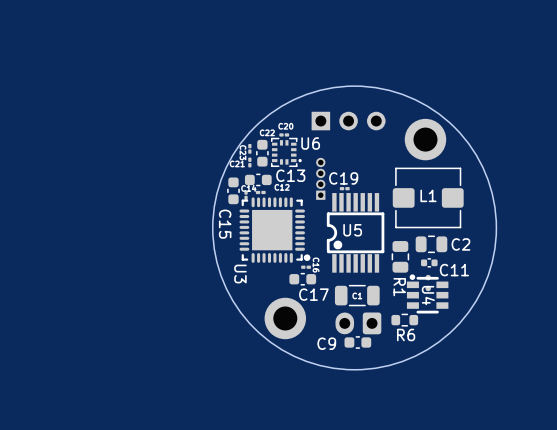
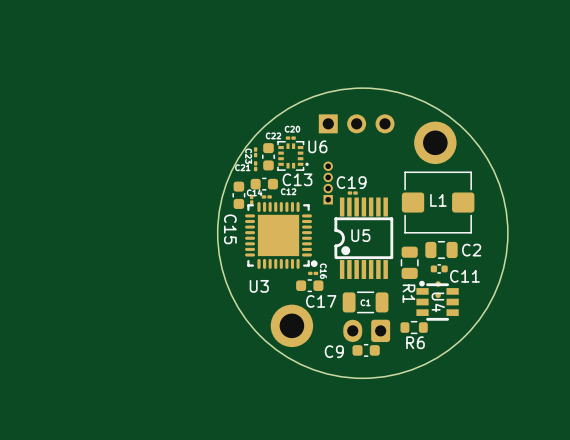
U3 name rotation: 0° (240, 274) -> 90° counterclockwise (259, 286)

